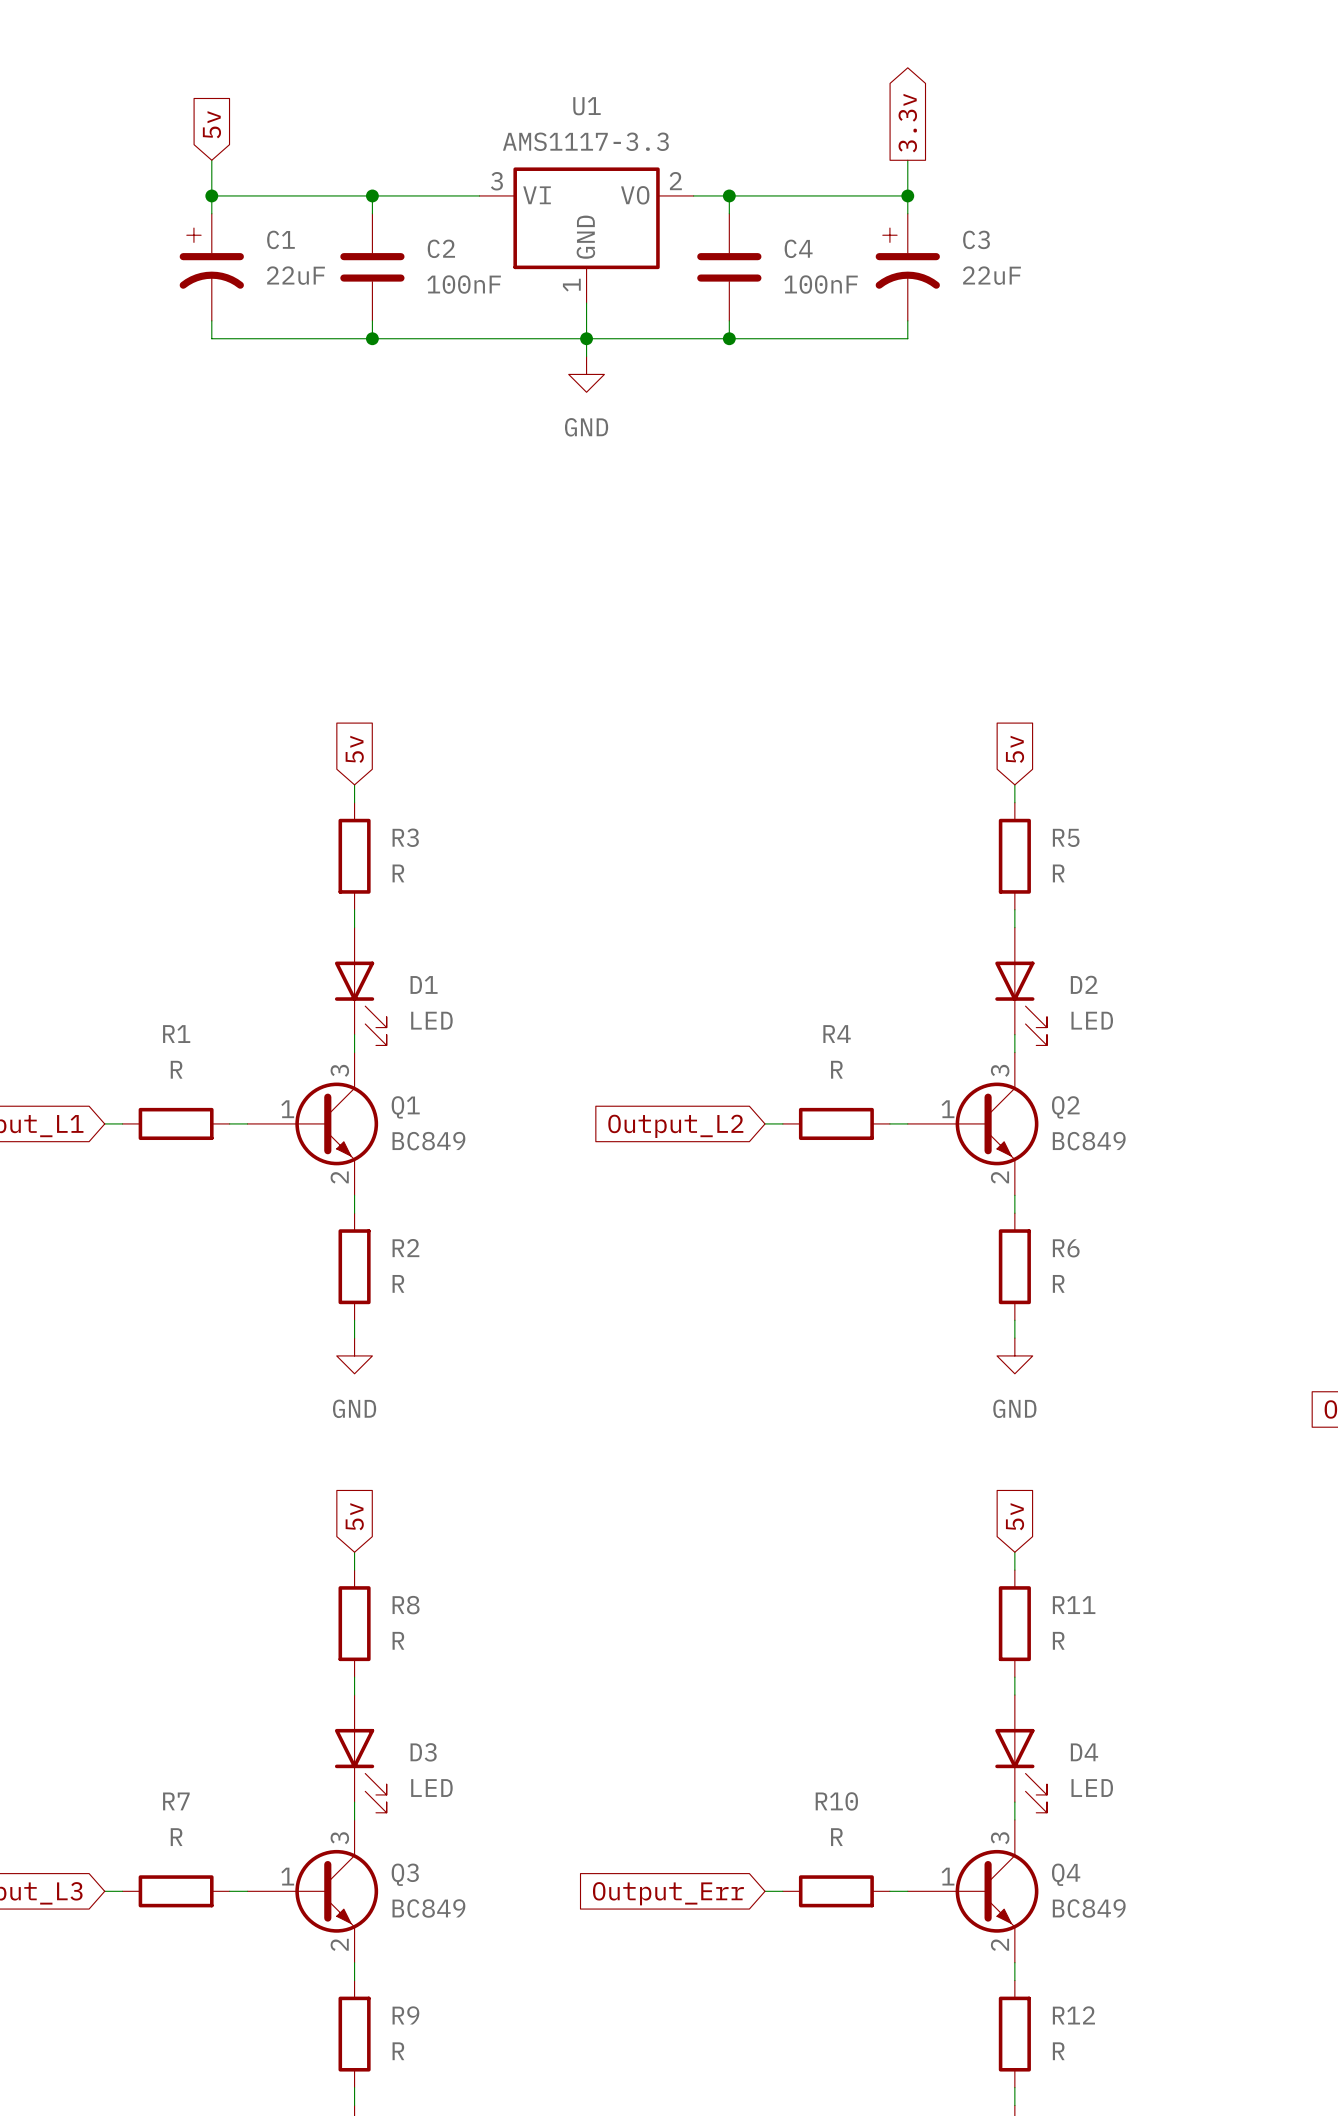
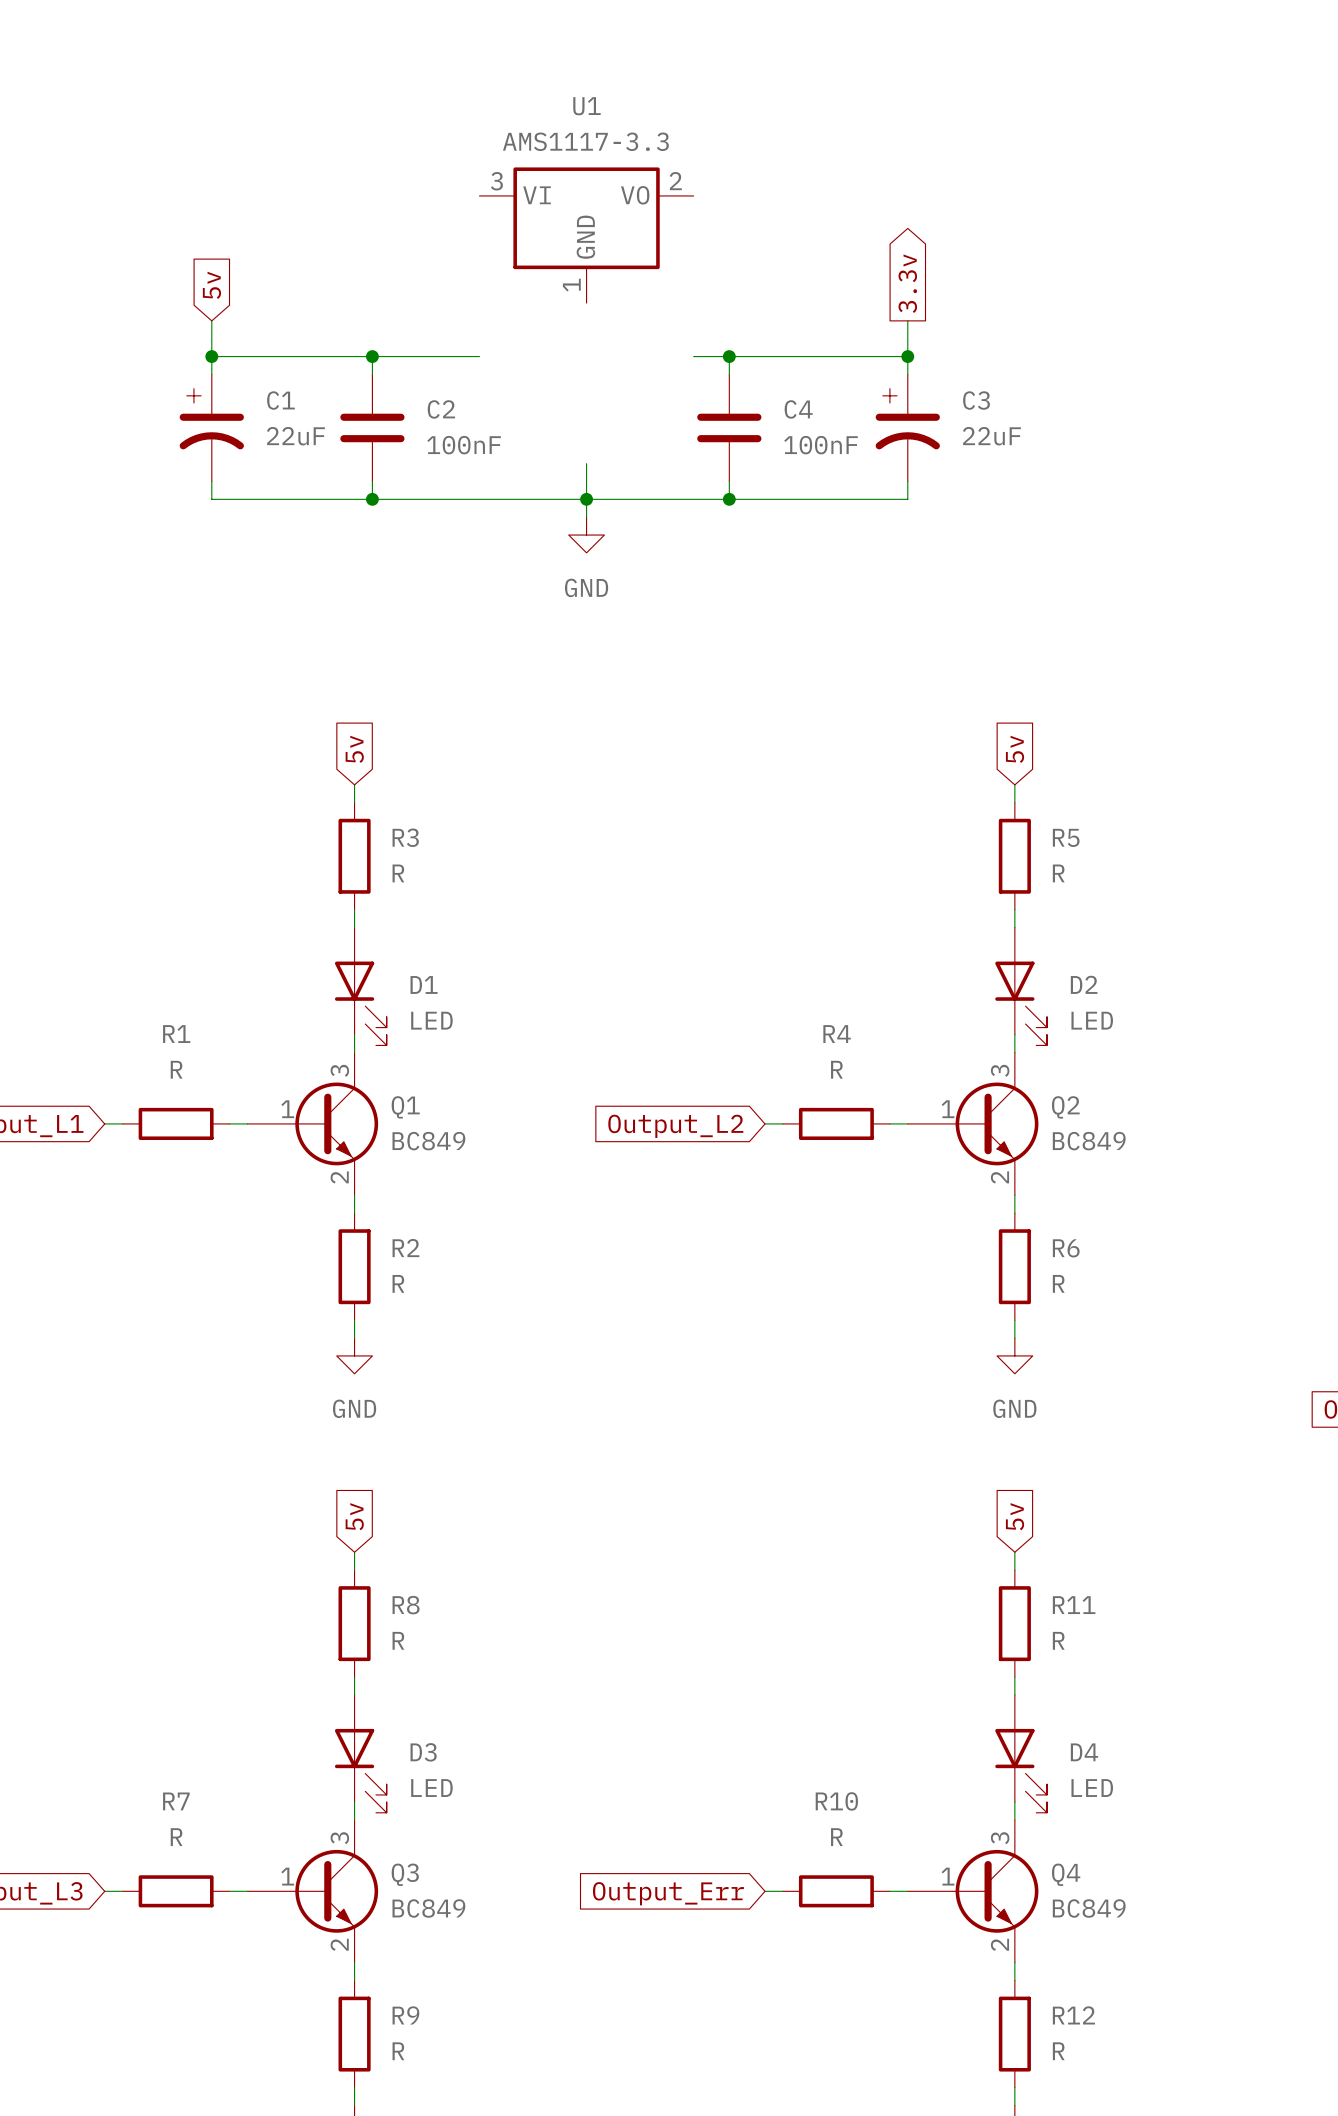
global label position: 3.3v (907, 123) -> 3.3v (907, 283)
global label position: 5v (211, 124) -> 5v (211, 285)
wire: (211, 160) (211, 213) -> none
wire: (907, 160) (907, 213) -> none
wire: (211, 195) (479, 195) -> (211, 356) (479, 356)
junction: (211, 195) -> none
wire: (372, 195) (372, 213) -> (372, 356) (372, 374)
junction: (372, 195) -> none
wire: (693, 195) (907, 195) -> (693, 356) (907, 356)
wire: (729, 195) (729, 213) -> (729, 356) (729, 374)
junction: (729, 195) -> none
junction: (907, 195) -> none
C1 position: (211, 267) -> (211, 427)
C2 position: (372, 267) -> (372, 427)
C4 position: (729, 267) -> (729, 427)
C3 position: (907, 267) -> (907, 427)
wire: (586, 303) (586, 356) -> (586, 463) (586, 517)
wire: (372, 320) (372, 338) -> (372, 481) (372, 499)
wire: (729, 320) (729, 338) -> (729, 481) (729, 499)
wire: (211, 338) (907, 338) -> (211, 338) (211, 374)
junction position: (372, 338) -> (372, 356)
junction: (586, 338) -> none
junction position: (729, 338) -> (729, 356)
wire: none -> (907, 338) (907, 374)
junction: none -> (211, 356)
junction: none -> (907, 356)
power symbol position: GND (586, 374) -> GND (586, 535)
wire: none -> (211, 481) (211, 499) (907, 499) (907, 481)
junction: none -> (372, 499)
junction: none -> (586, 499)
junction: none -> (729, 499)

